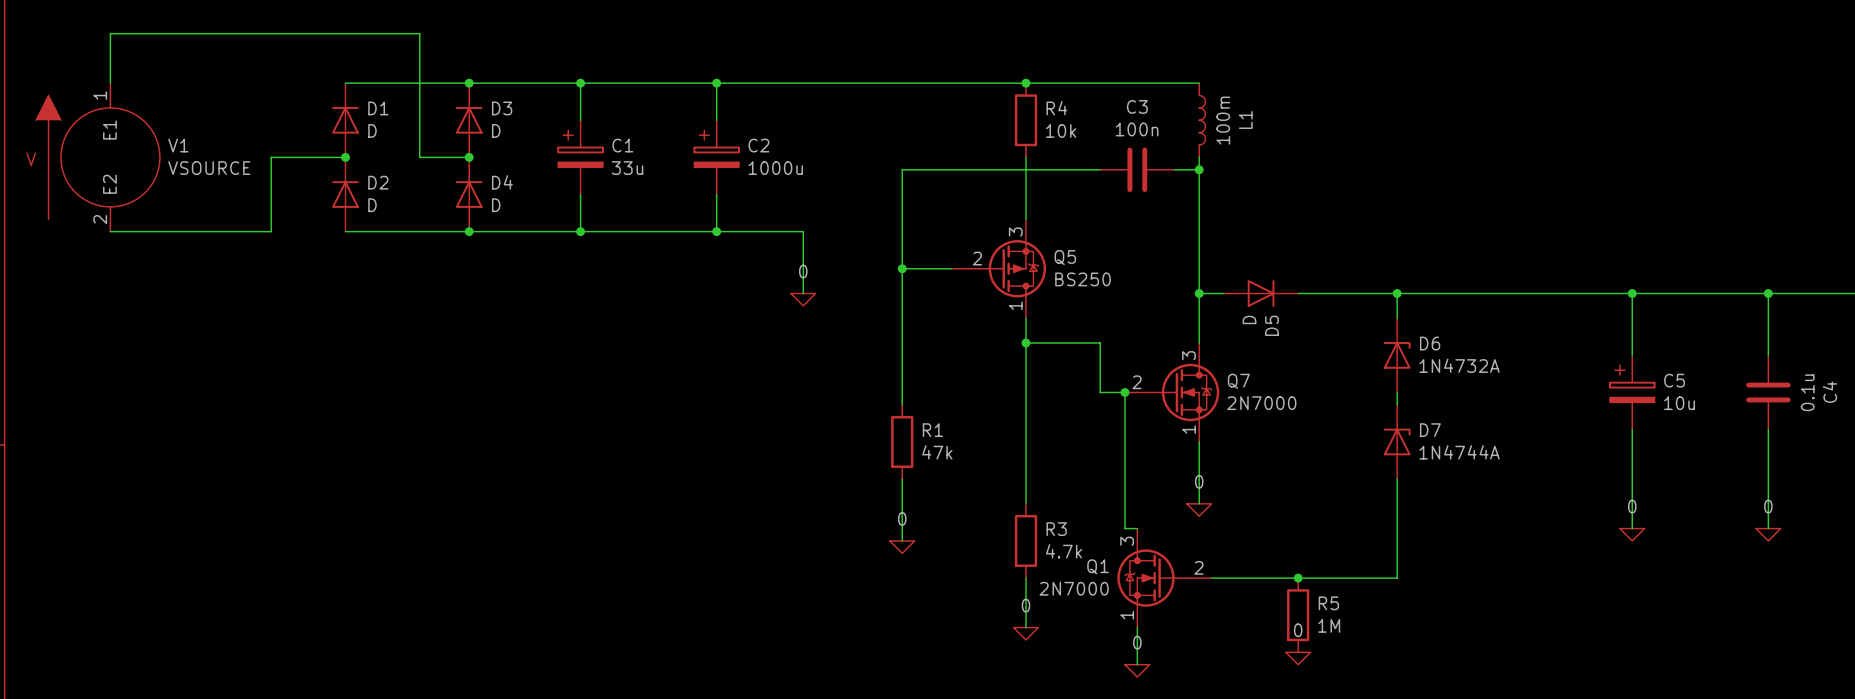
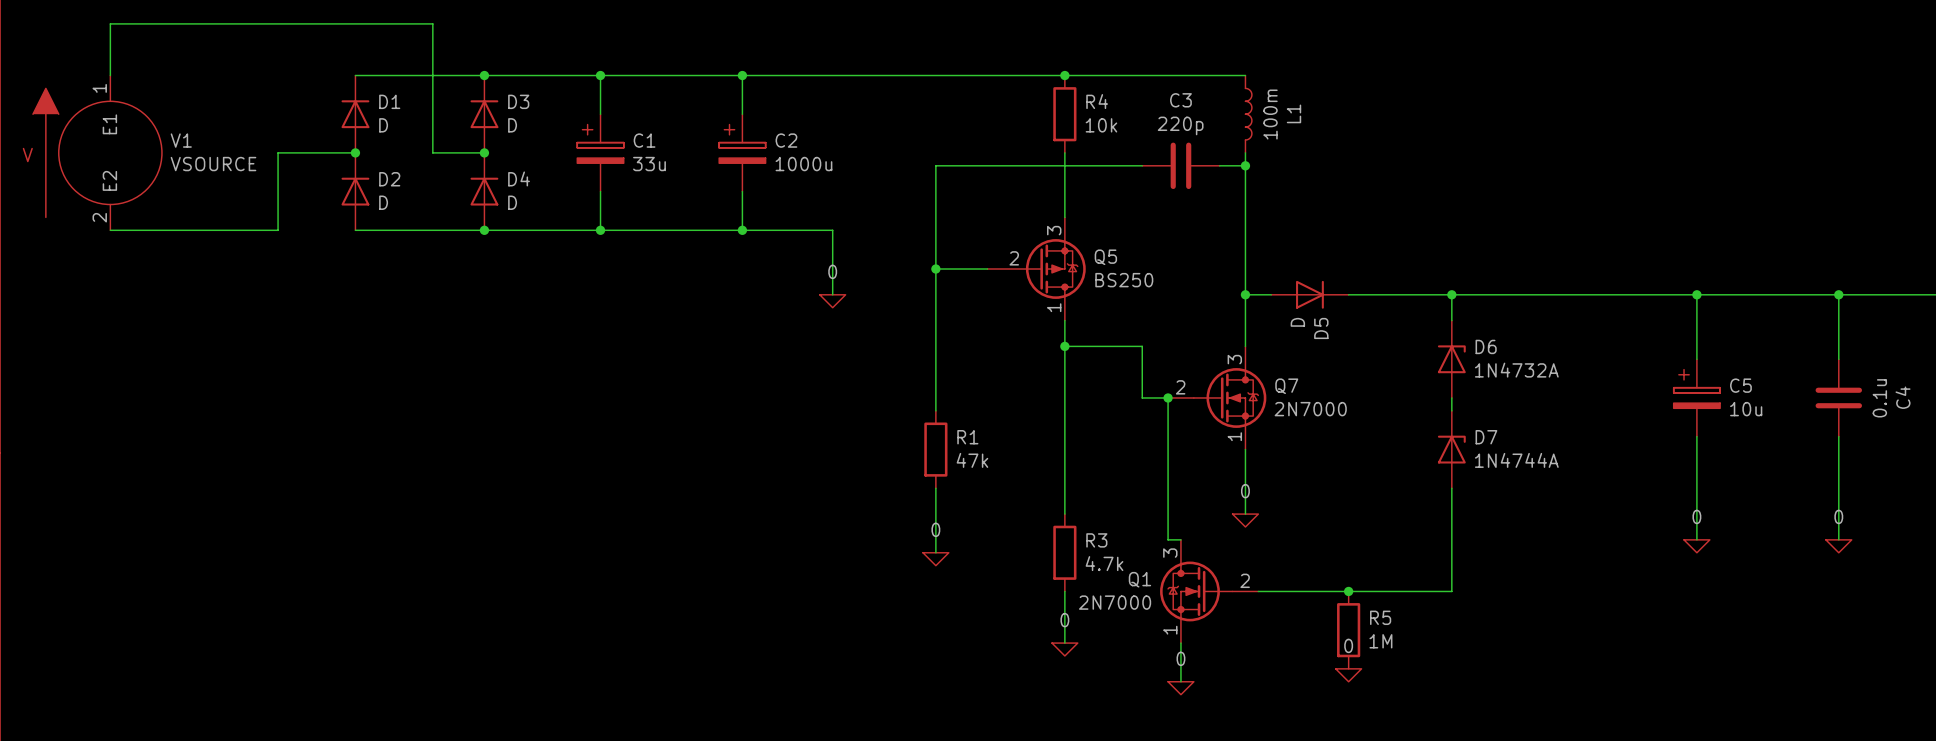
C3 value: 100n (1137, 129) -> 220p (1180, 125)

